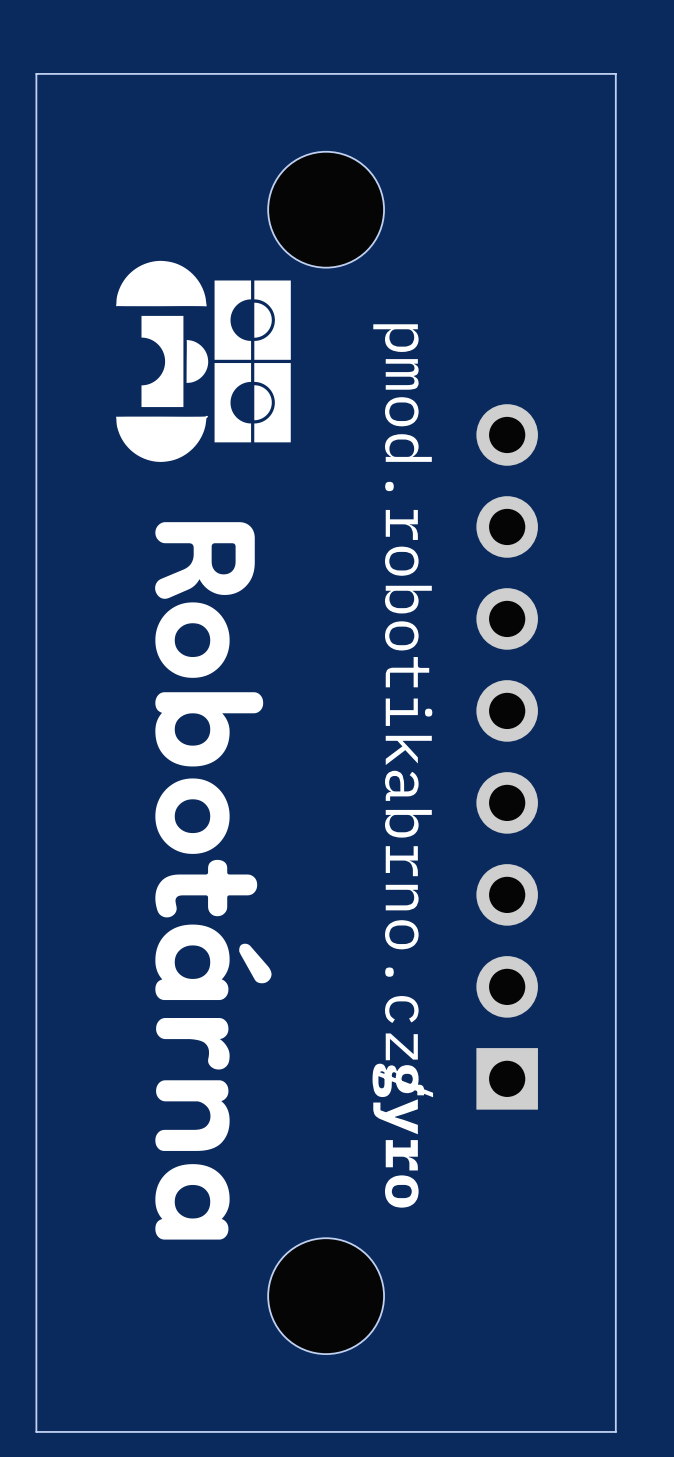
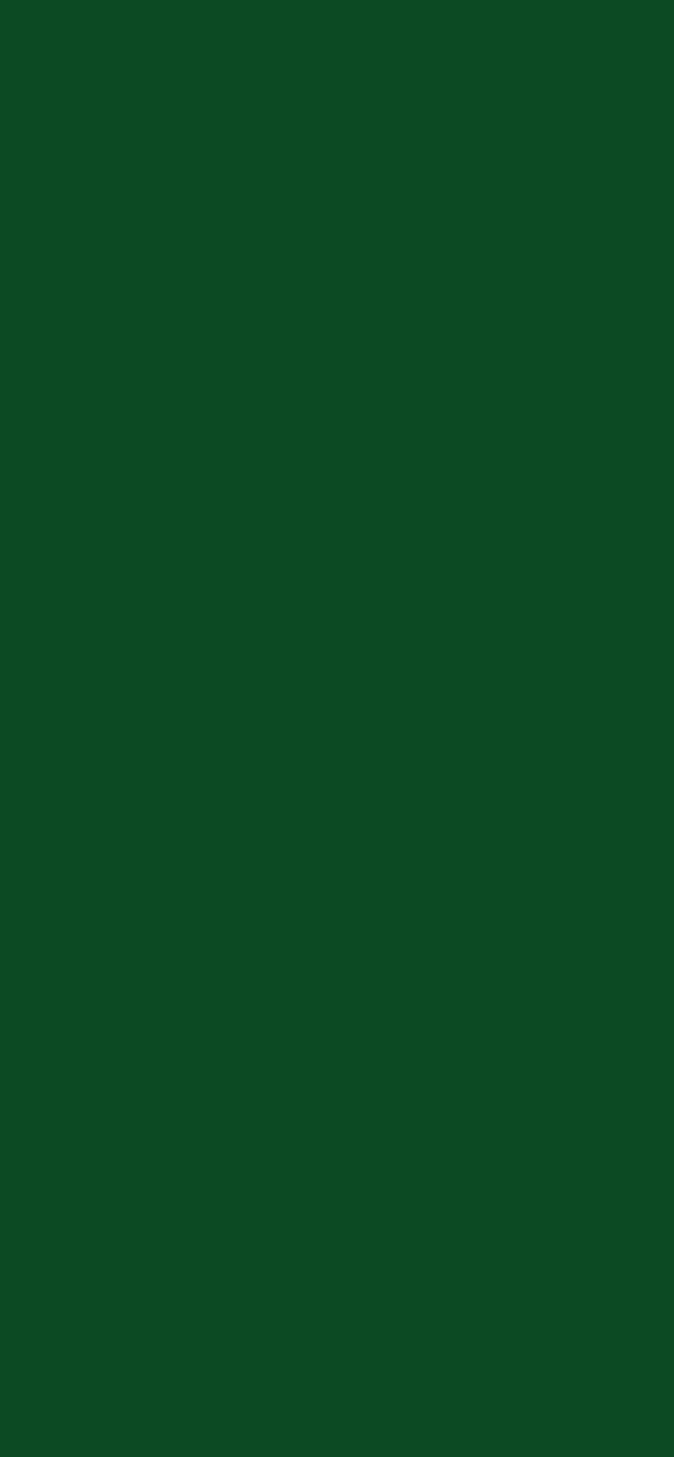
board edge: (615, 73) (36, 73) (36, 1431) (615, 1431) (615, 73) -> none
part: (326, 209) -> none
drawing: [116, 260, 291, 462] -> none
drawing: [155, 522, 272, 1240] -> none
text: pmod.robotikabrno.cz/ (403, 710) -> none
part: (507, 756) -> none
text: gyro (398, 1135) -> none
part: (326, 1296) -> none

